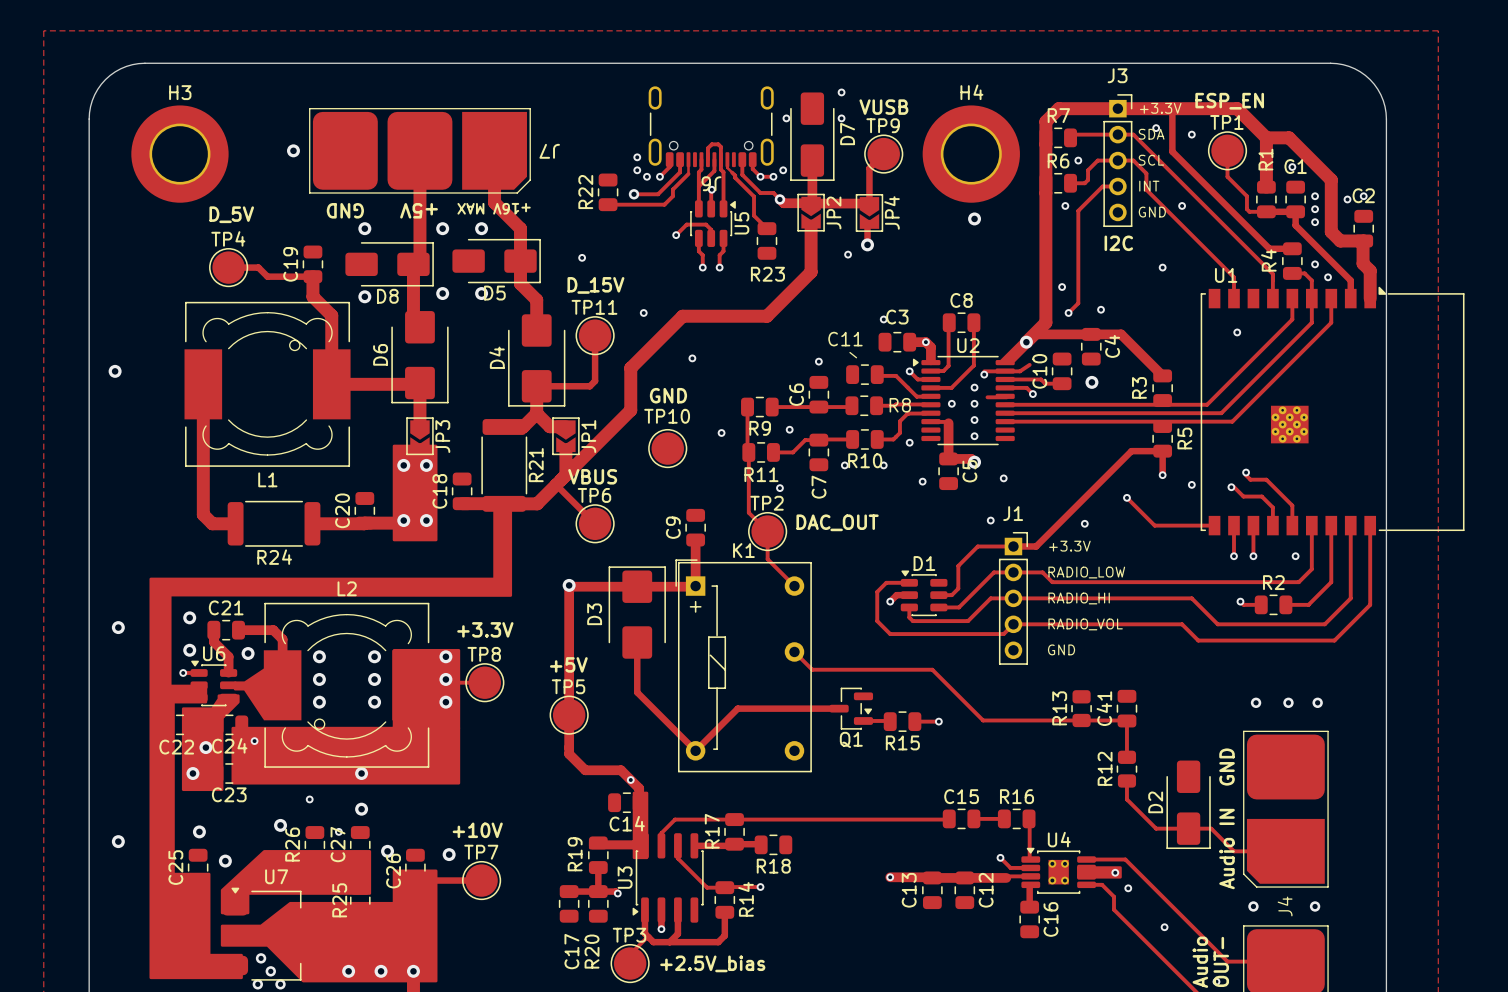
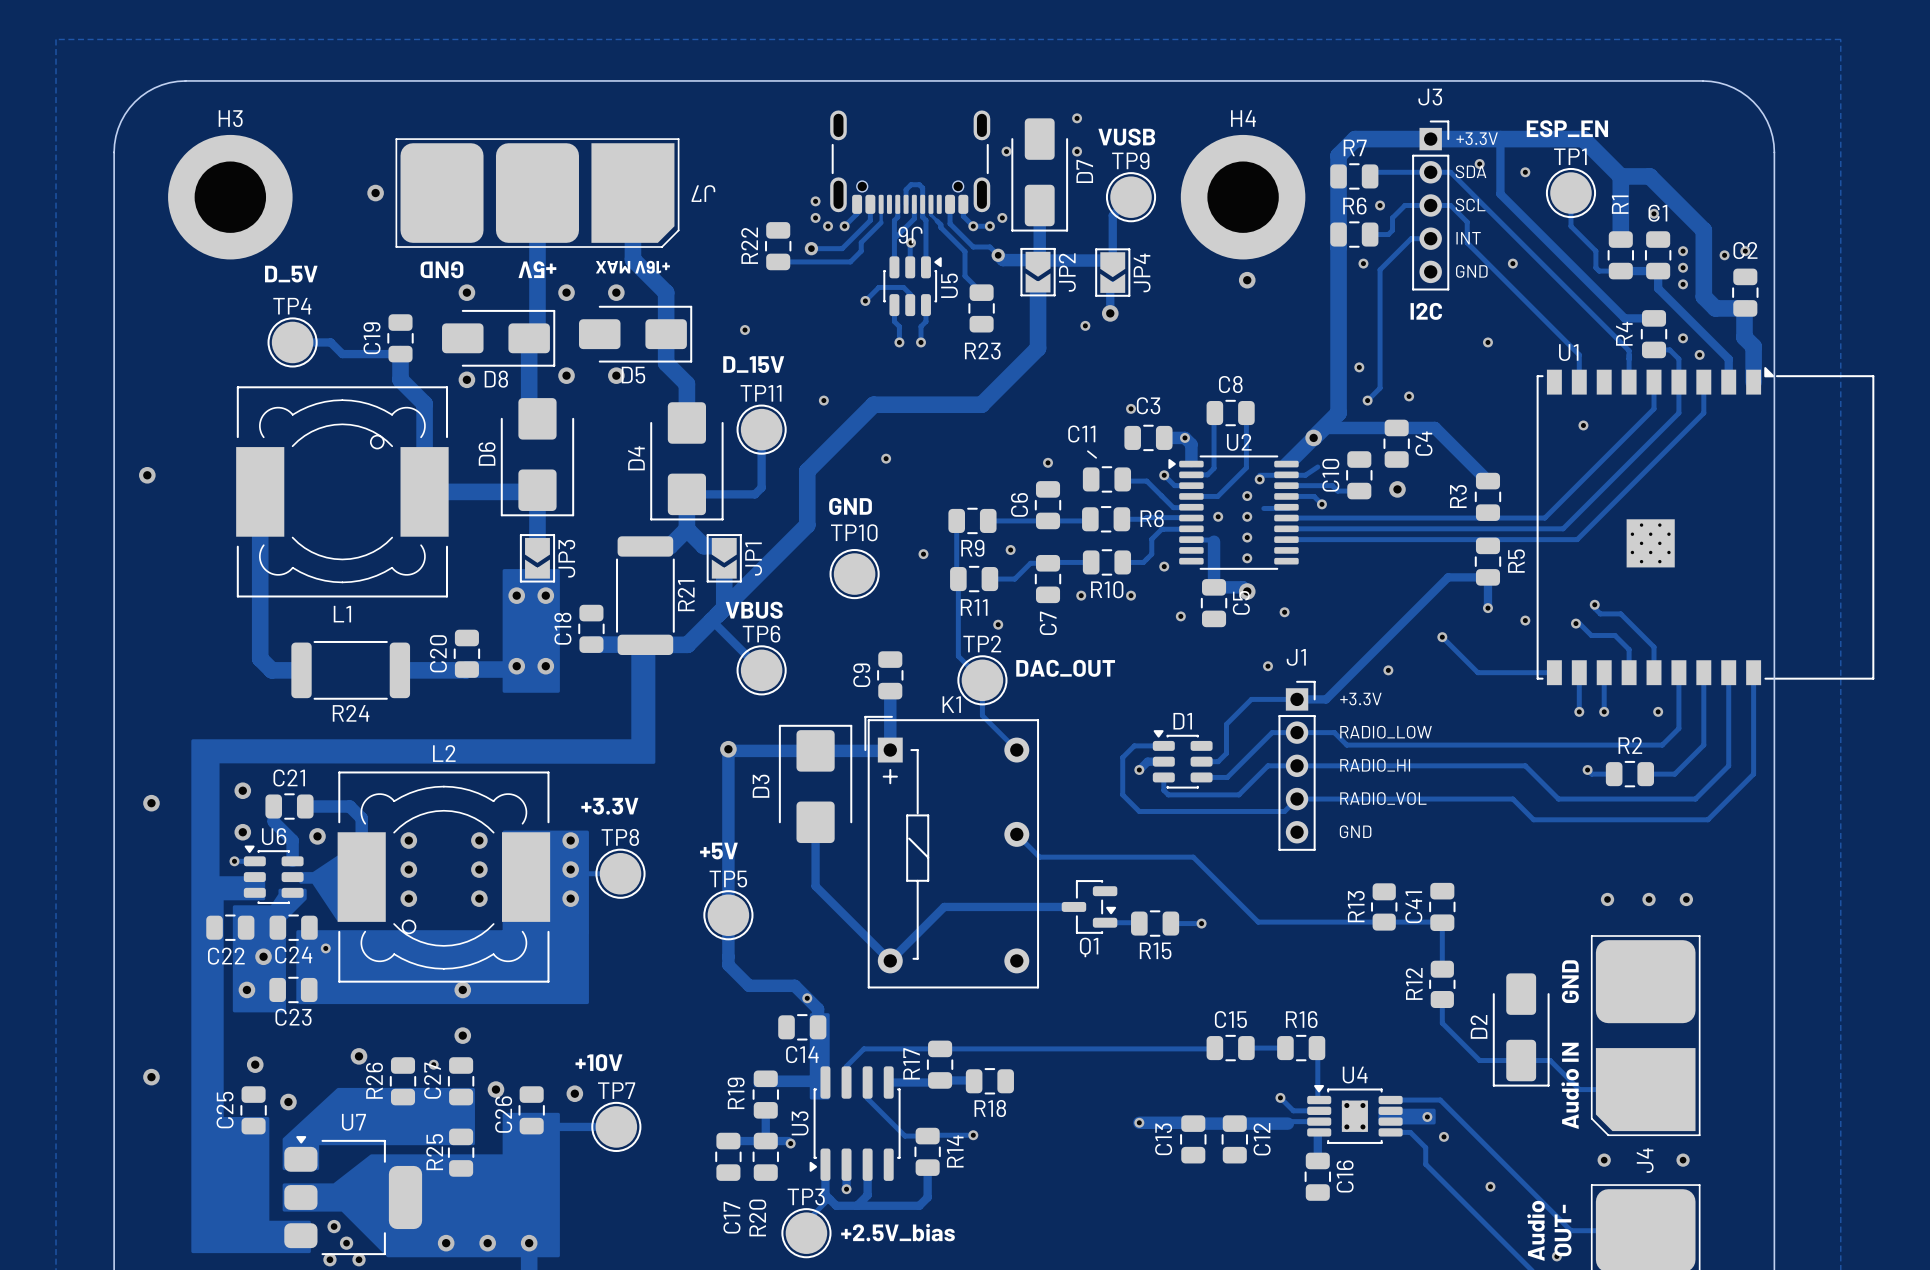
via: (309, 799) -> none

